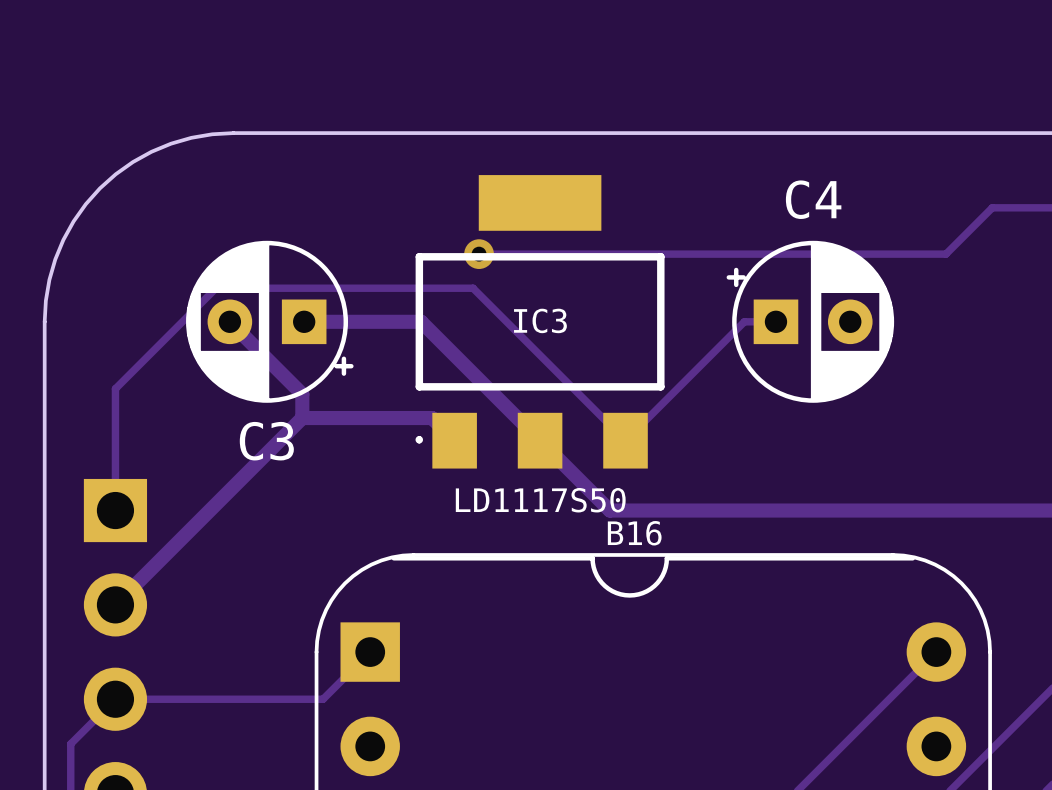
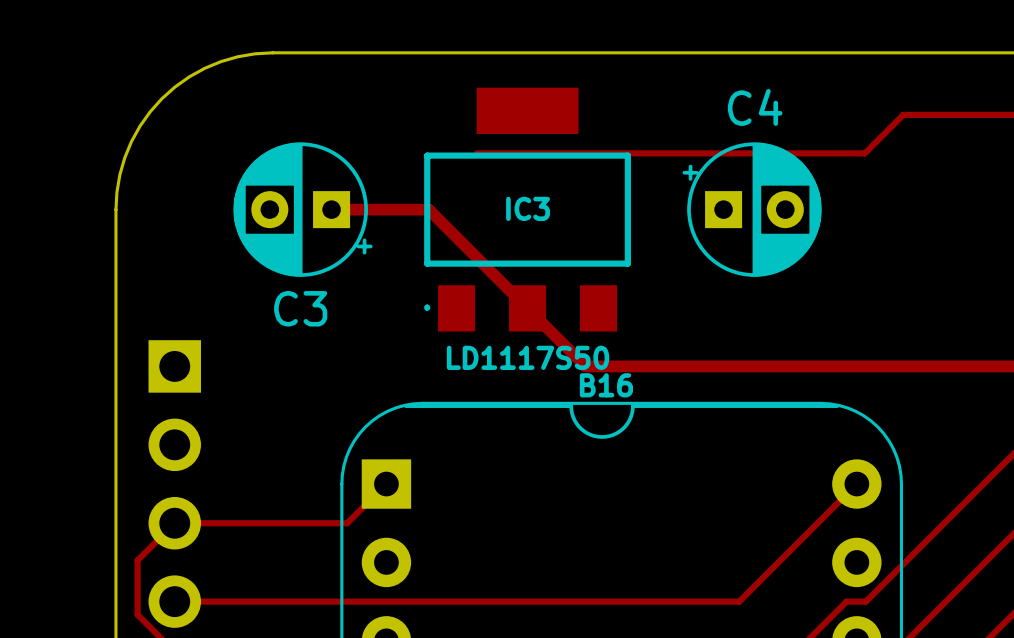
via: (479, 254) -> none
track: (229, 321) (302, 394) (302, 418) -> none
track: (775, 321) (744, 321) (625, 440) (473, 288) (216, 288) (115, 388) (115, 510) -> none
track: (302, 418) (431, 418) (454, 440) -> none
track: (302, 418) (115, 604) -> none

